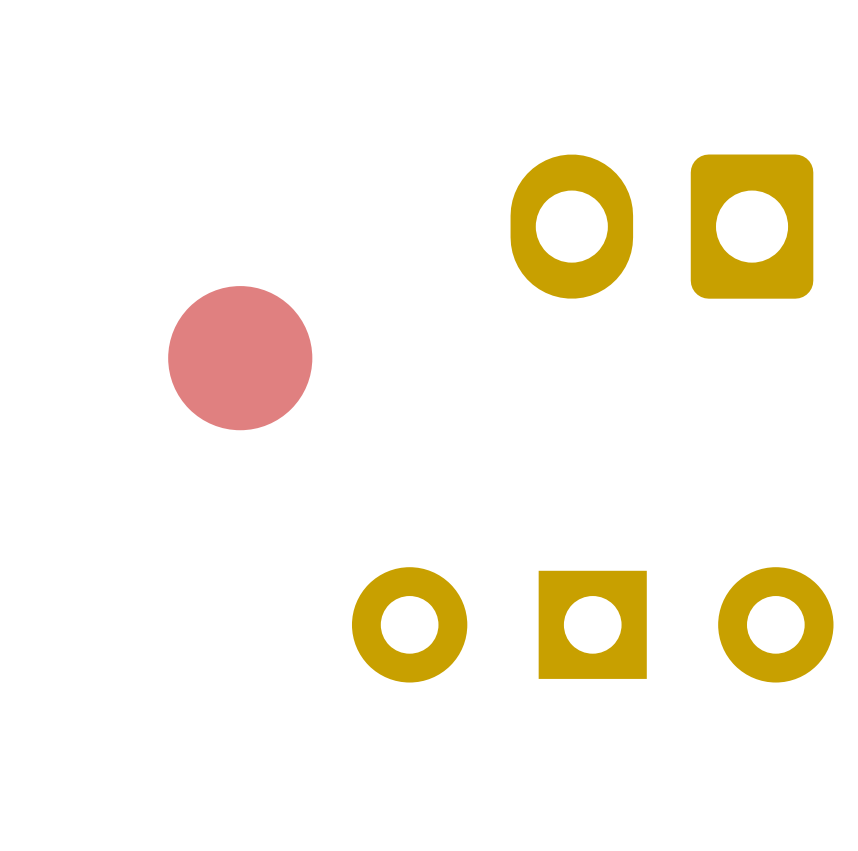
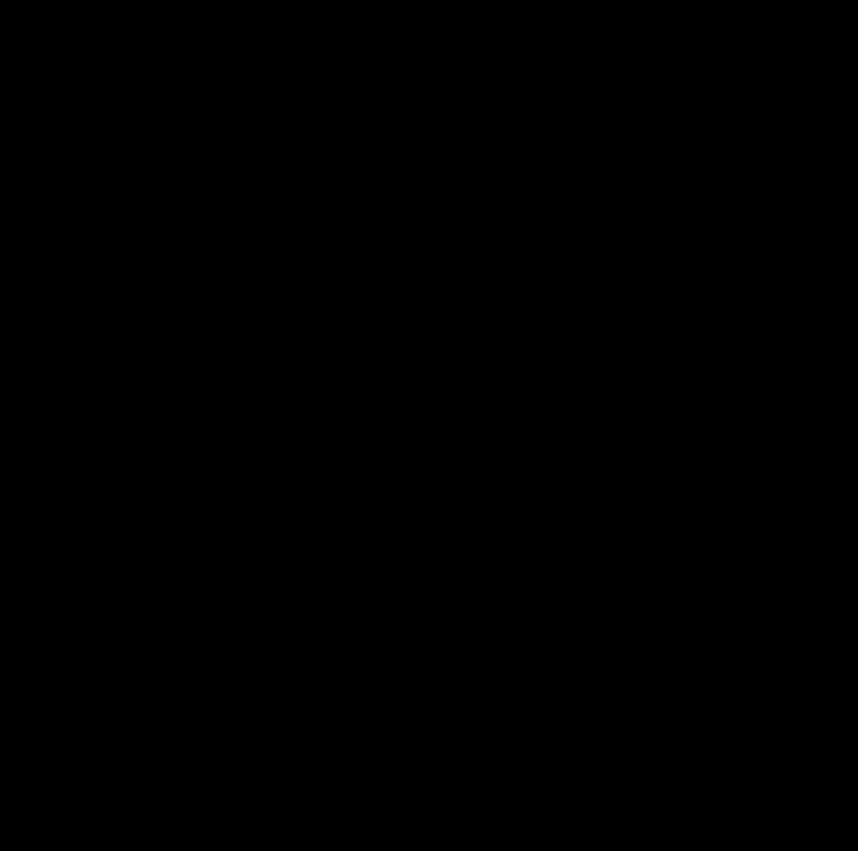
part: (661, 226) -> none
part: (240, 358) -> none
part: (592, 624) -> none

